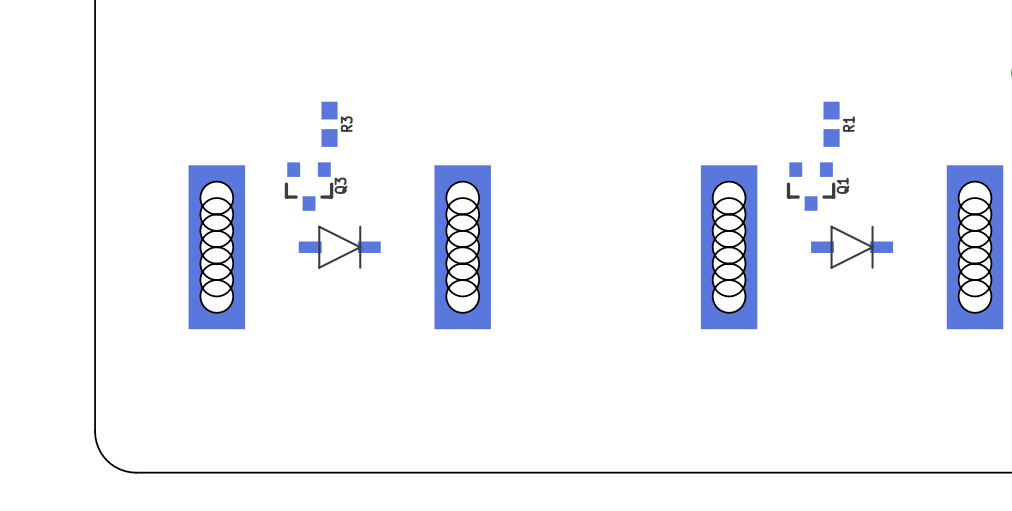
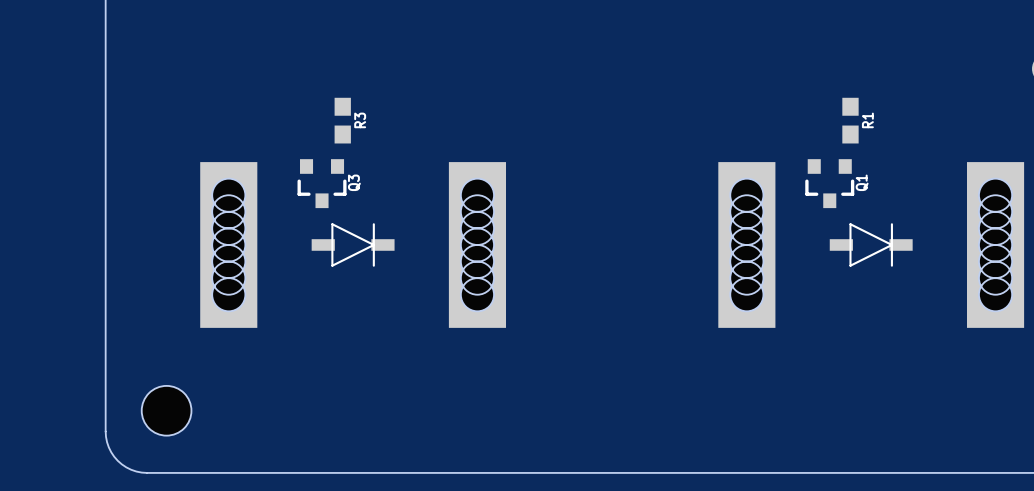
hole: none -> (166, 410)

